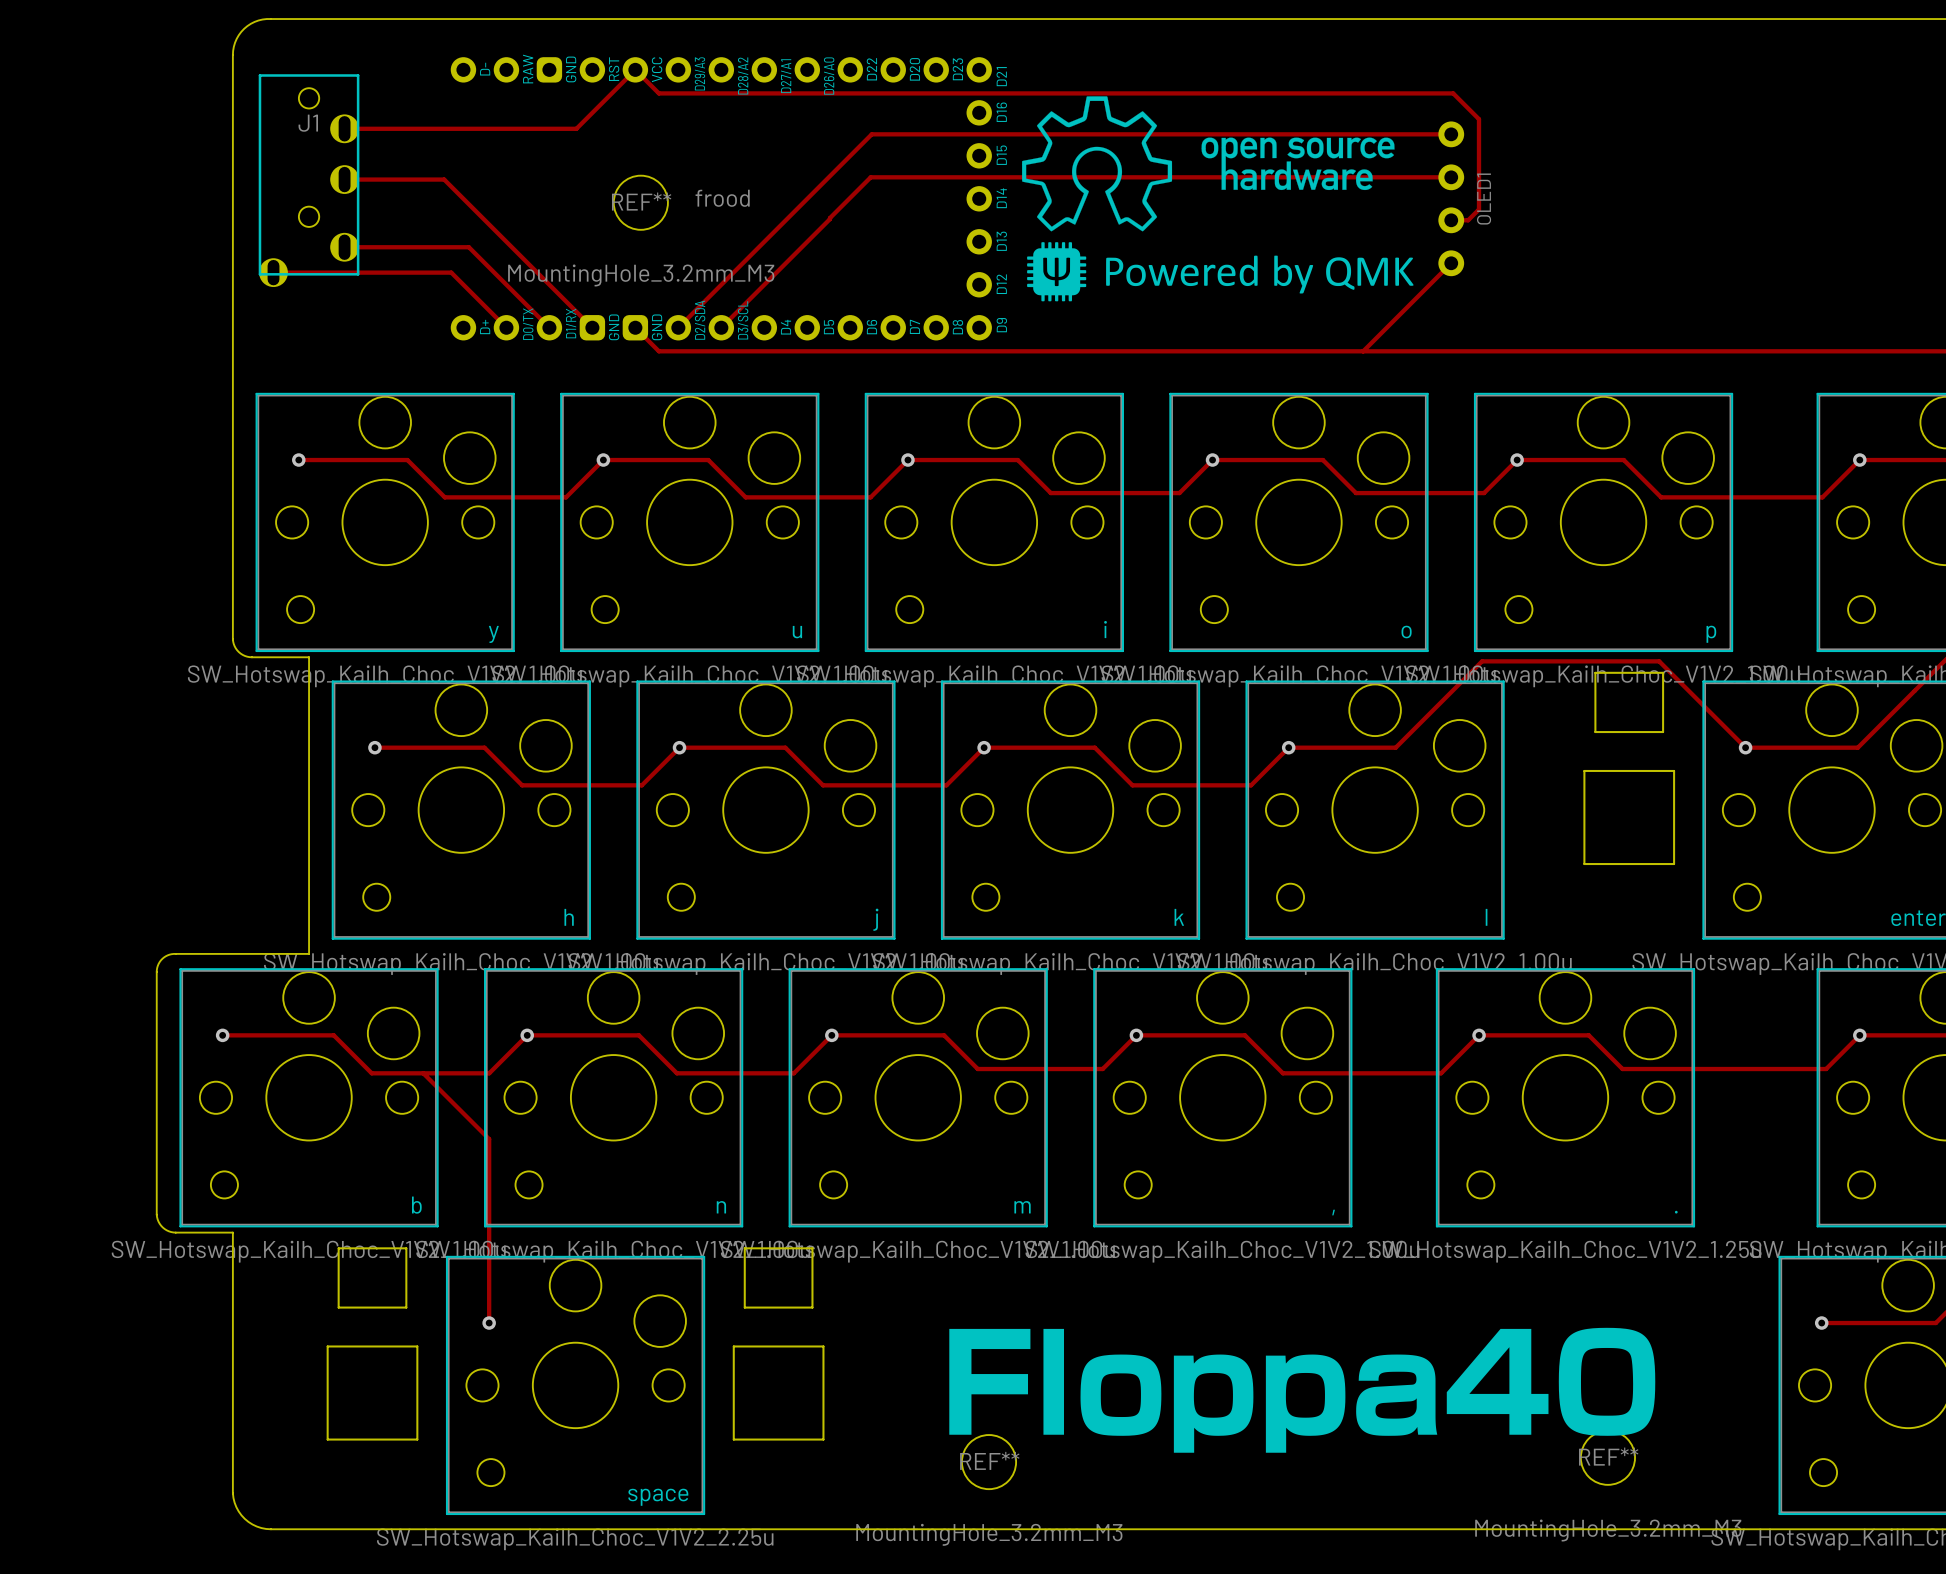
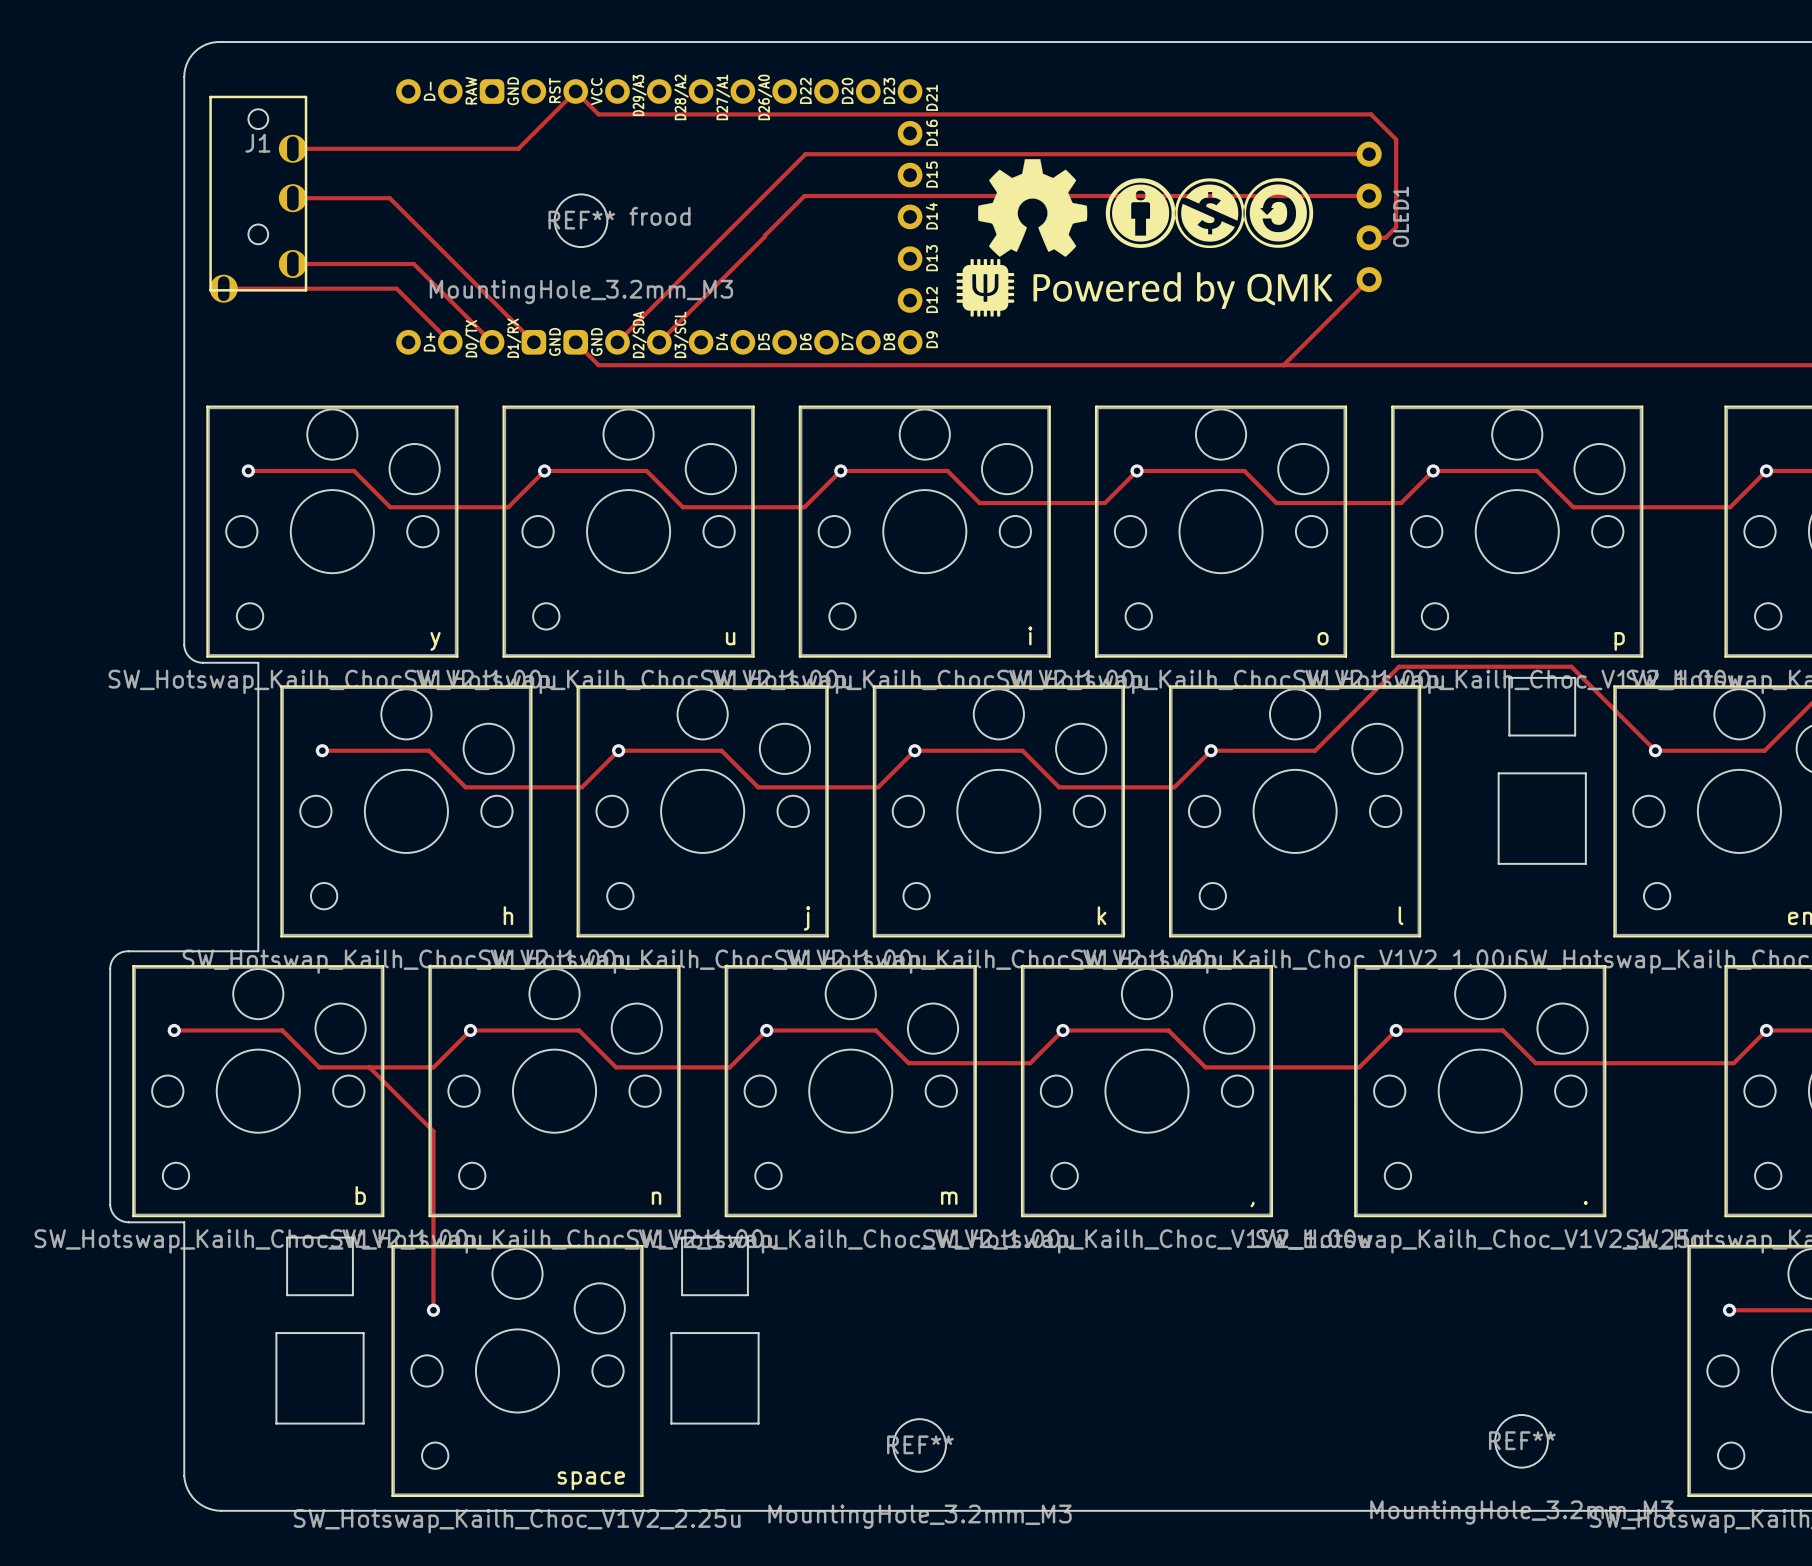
drawing: [1022, 96, 1395, 232] -> none
drawing: none -> [978, 159, 1314, 257]
drawing: [949, 1327, 1656, 1453] -> none

